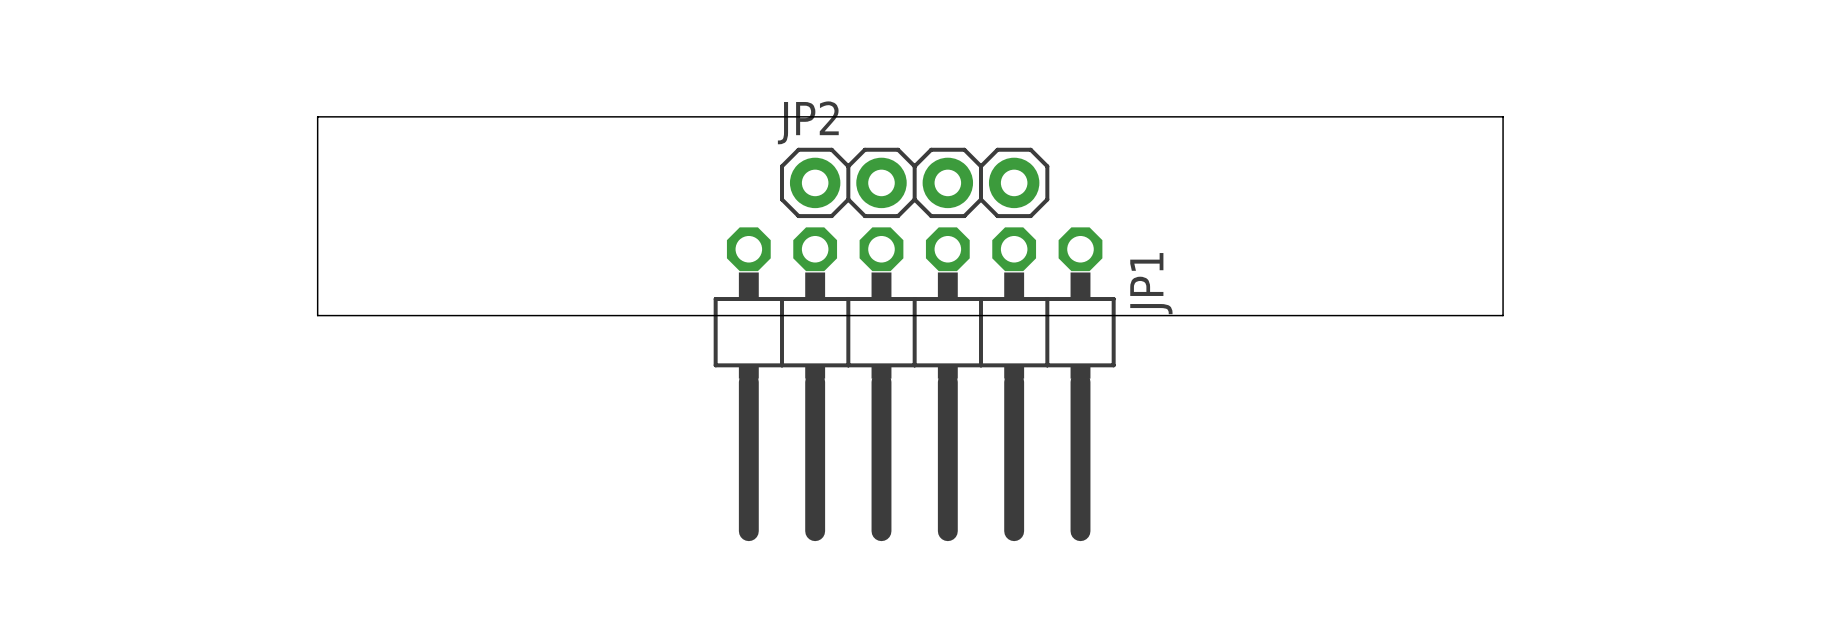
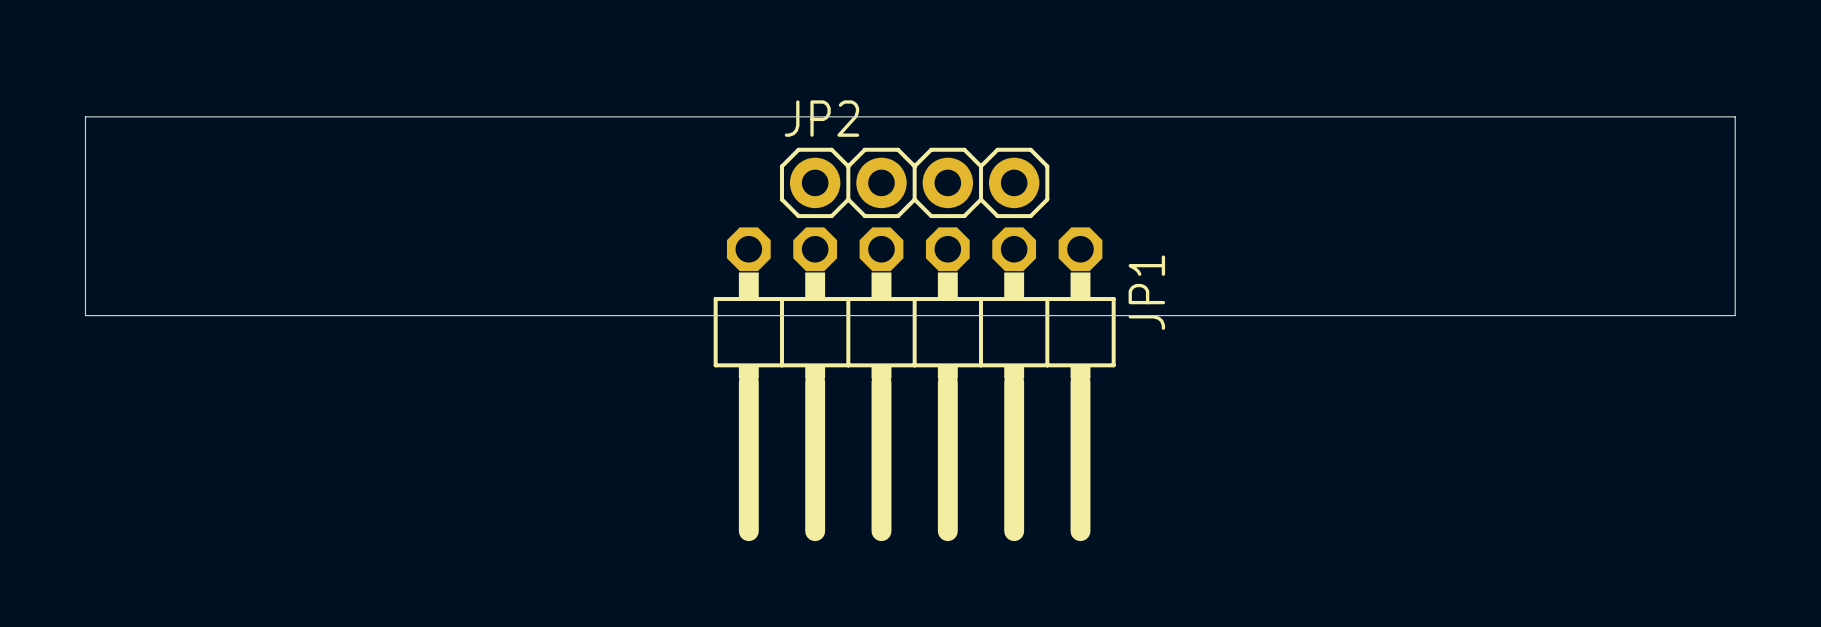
board edge: (317, 116) (317, 315) -> (317, 116) (85, 116) (85, 315) (317, 315)
board edge: (1503, 116) (1503, 315) -> (1503, 116) (1735, 116) (1735, 315) (1503, 315)

